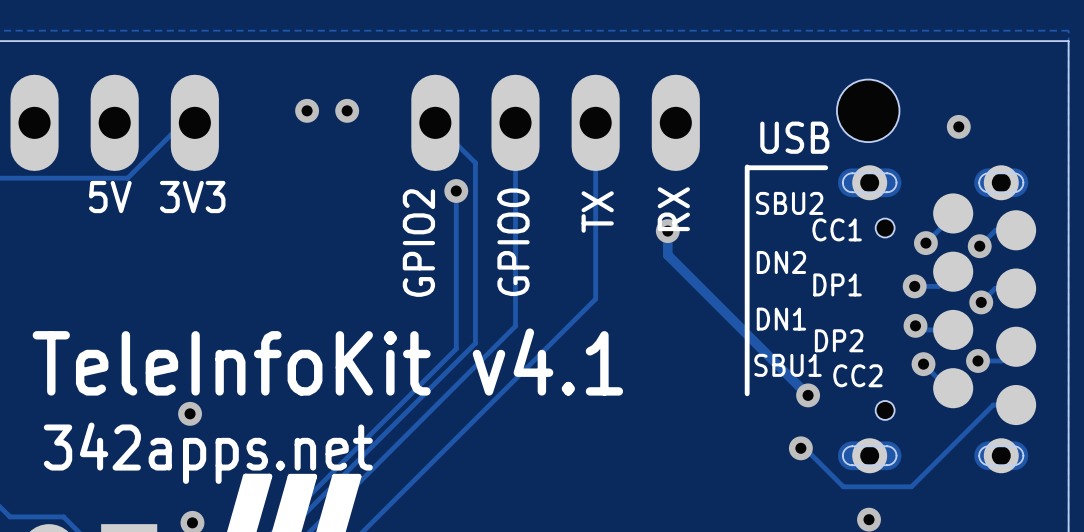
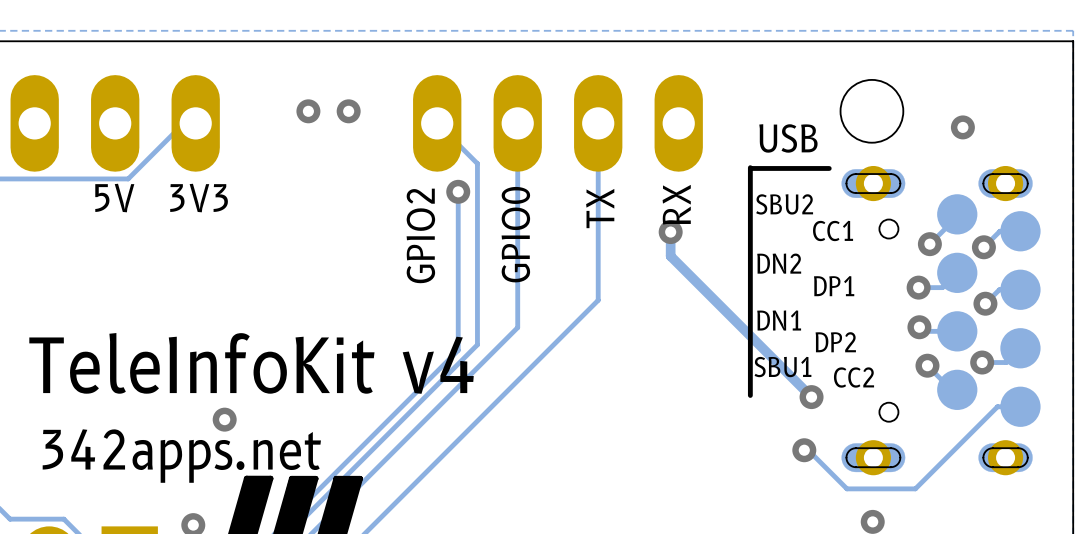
text: TeleInfoKit v4.1 (327, 362) -> TeleInfoKit v4 (251, 363)
via position: (190, 413) -> (224, 419)

